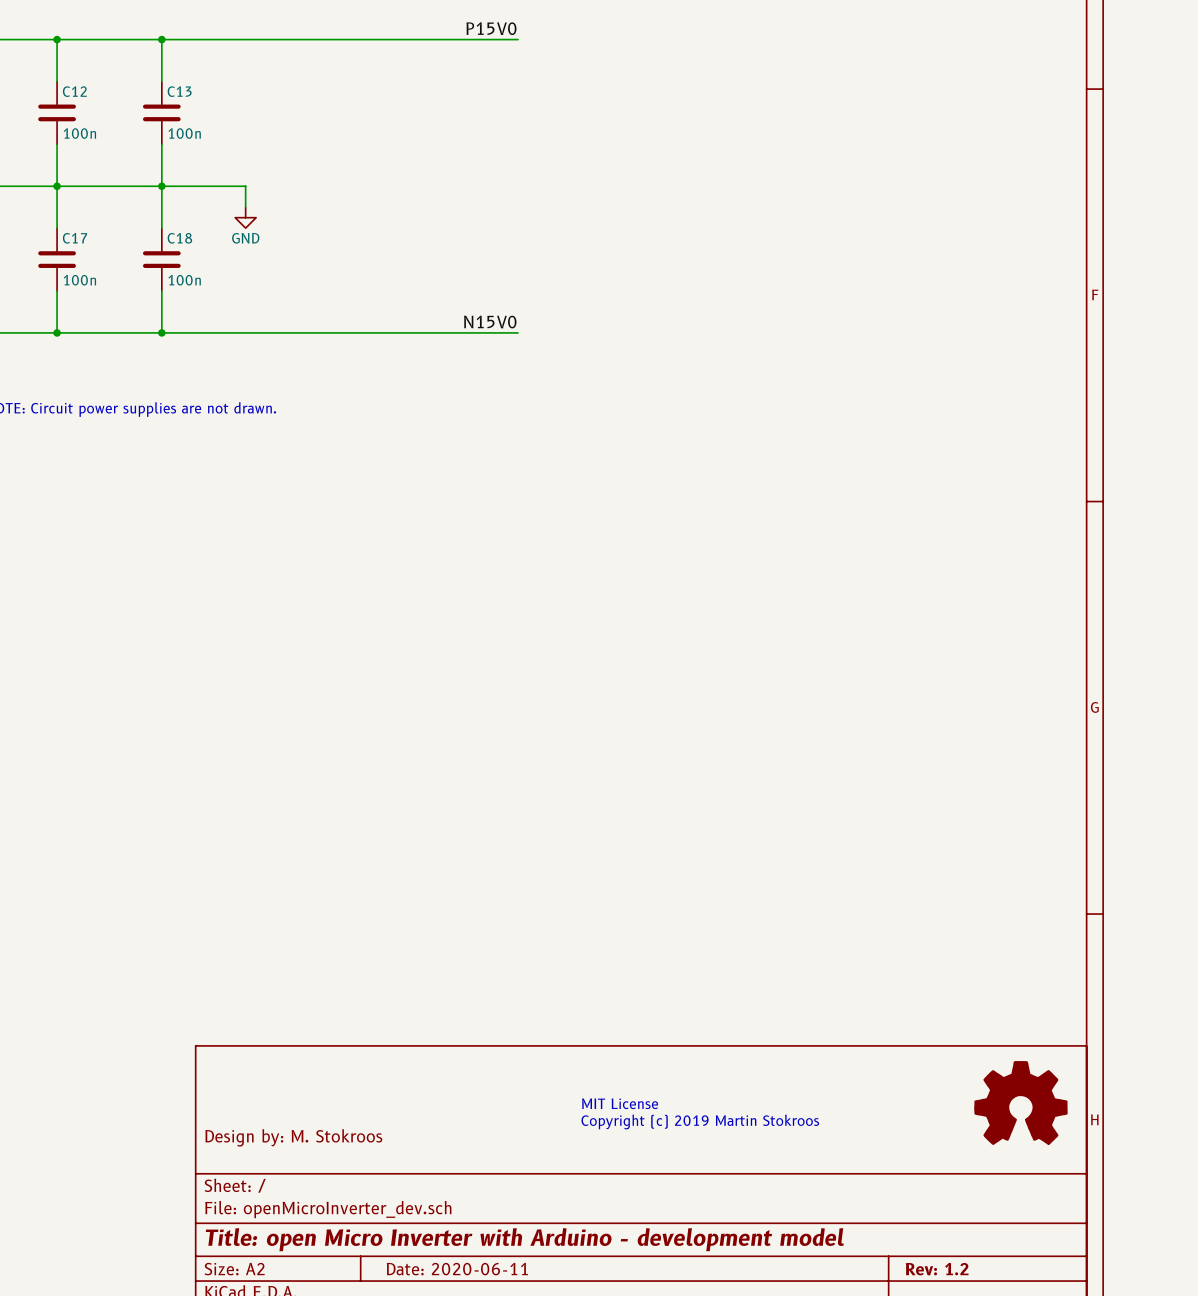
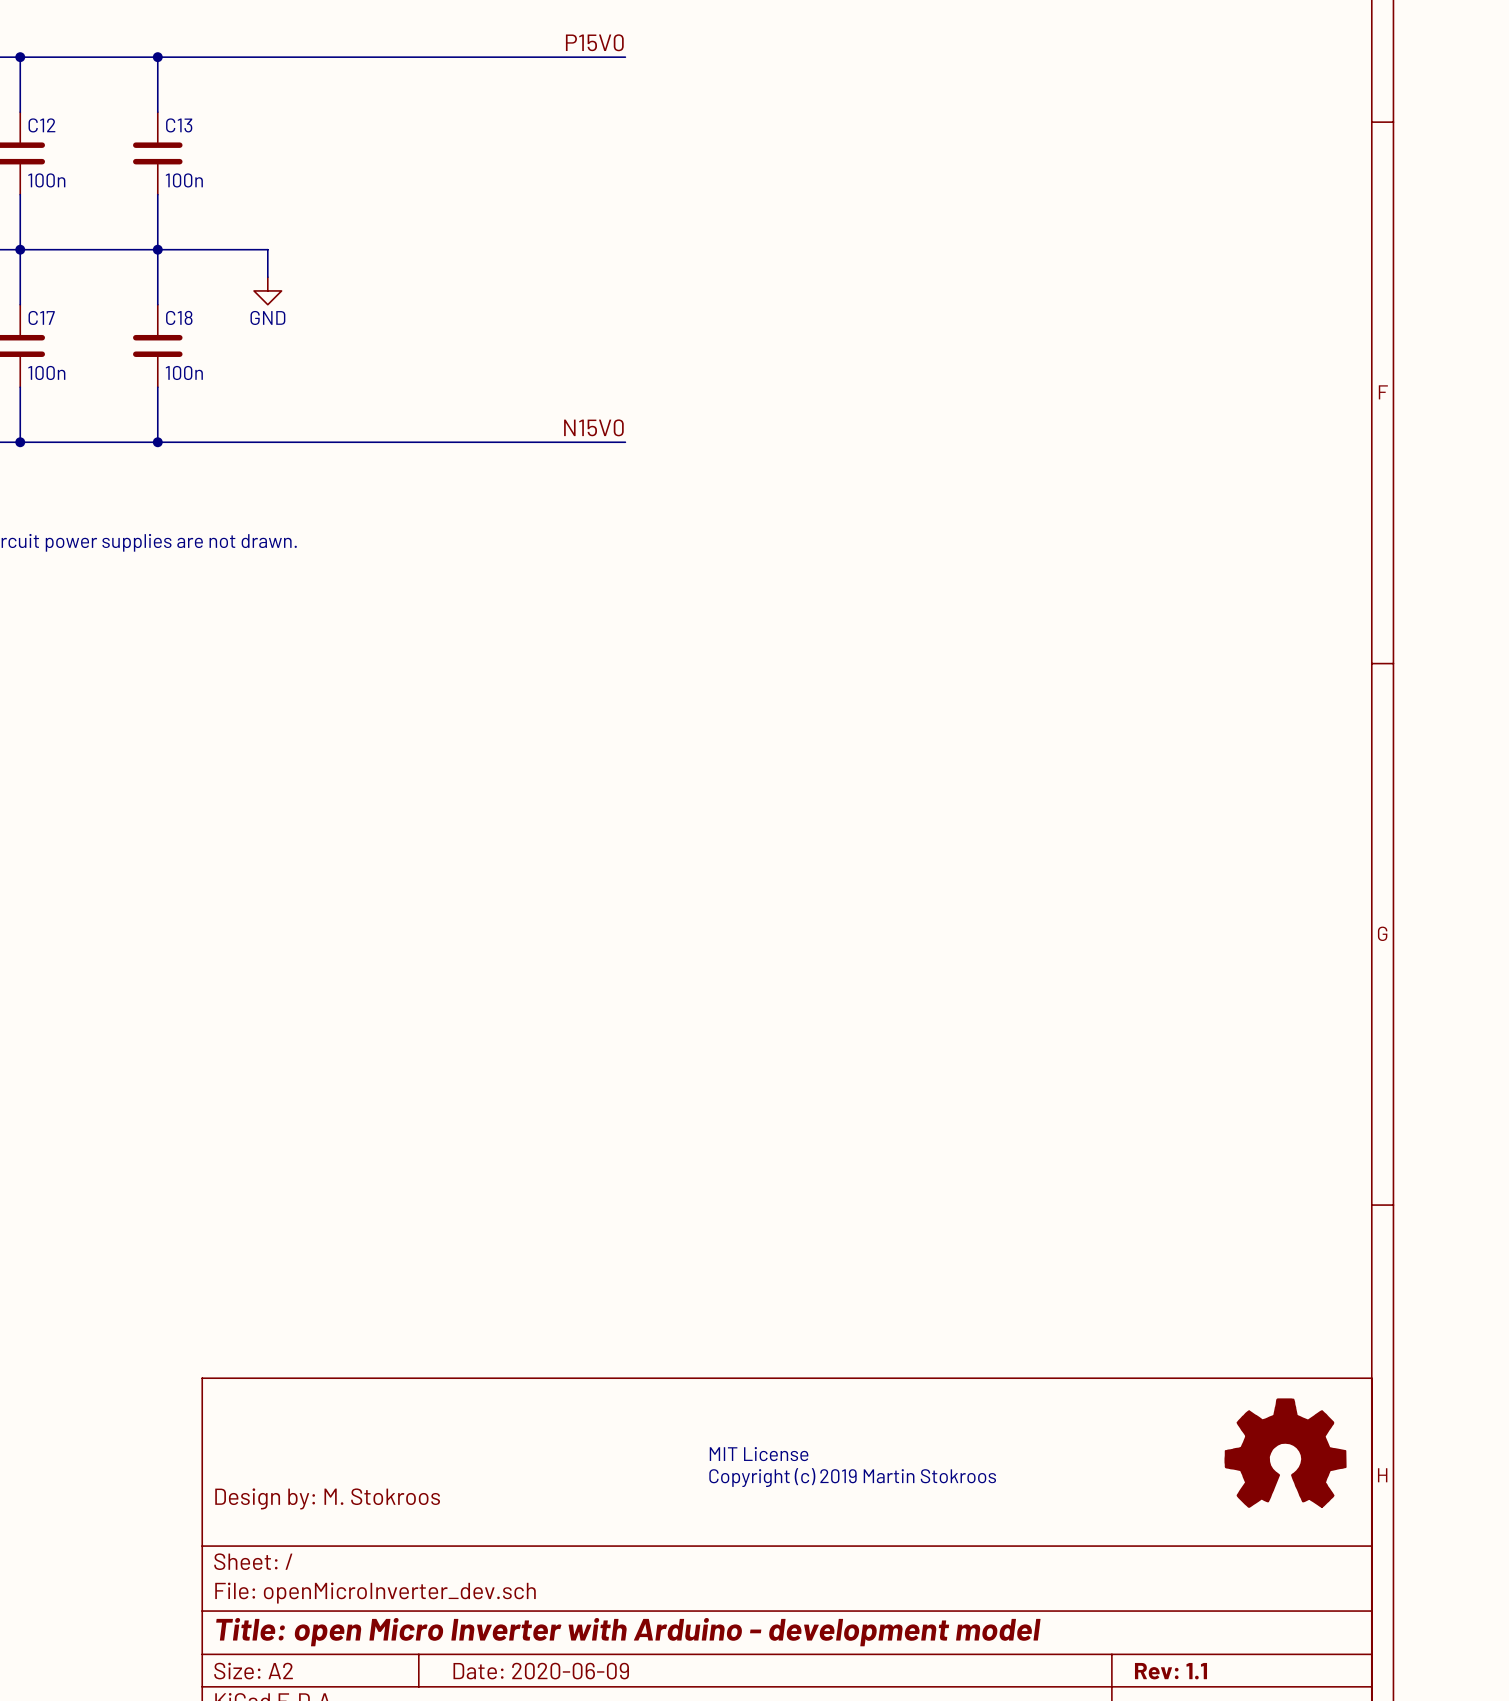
title block: Date: 2020-06-11 (457, 1269) -> Date: 2020-06-09 (541, 1671)
title block: Rev: 1.2 (937, 1269) -> Rev: 1.1 (1170, 1671)

